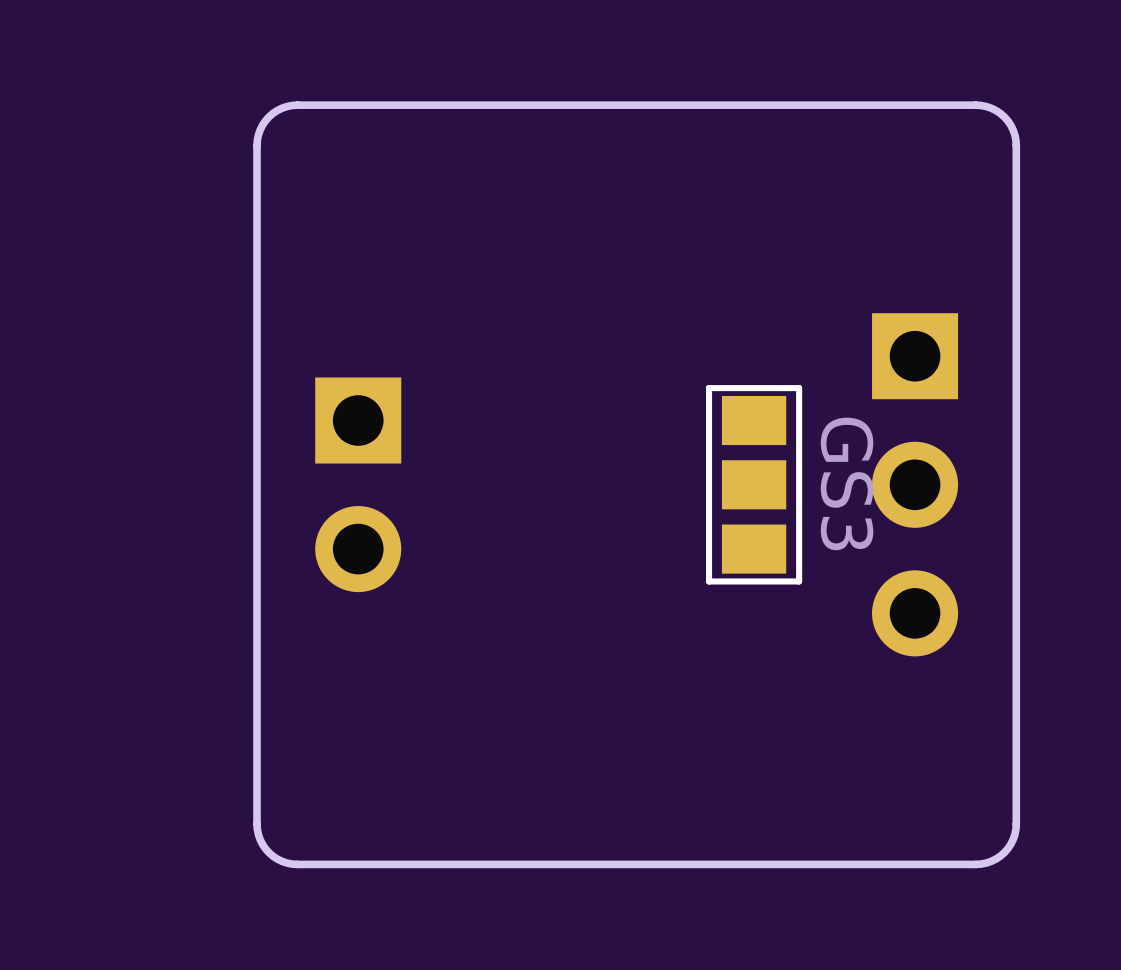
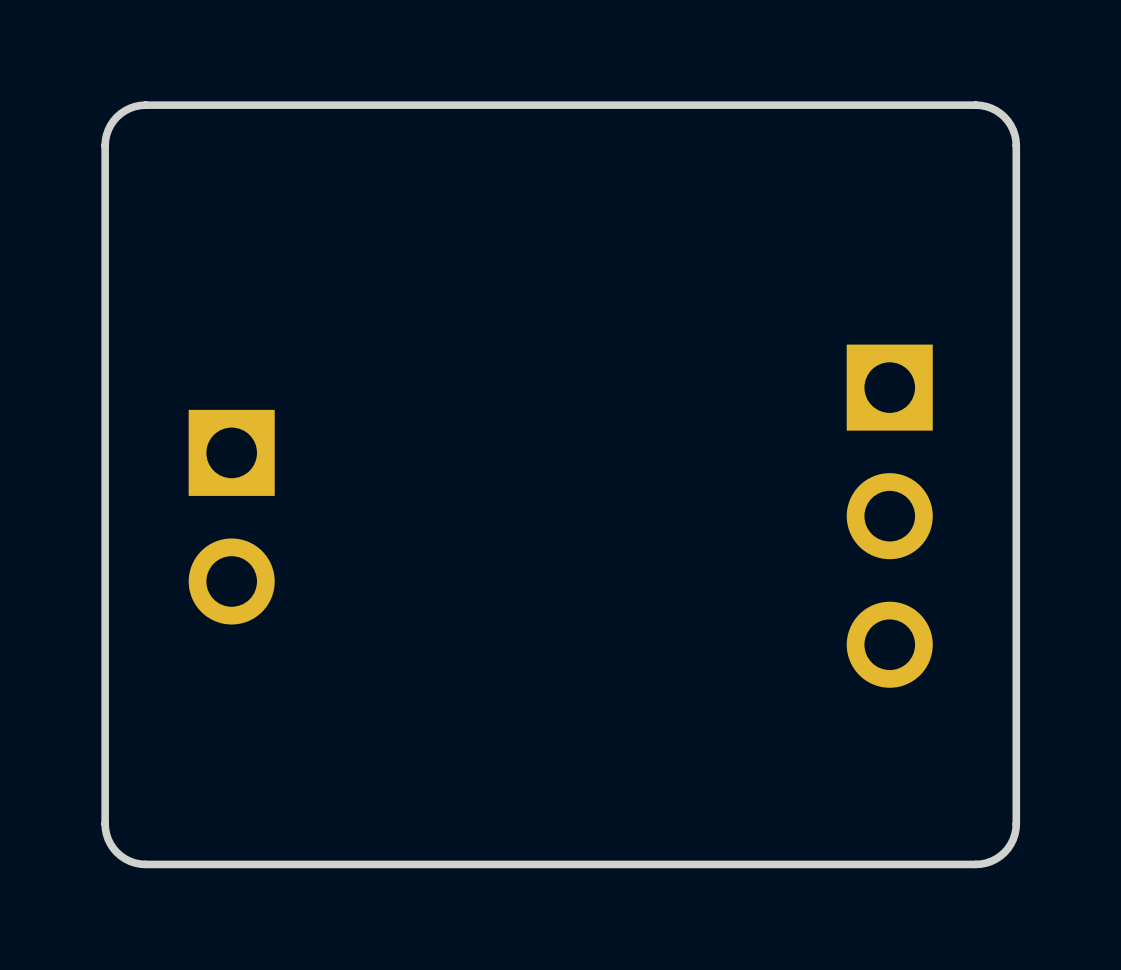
board edge: (297, 105) (282, 108) (268, 117) (260, 130) (257, 145) (257, 823) (260, 839) (268, 852) (282, 861) (297, 864) -> (297, 105) (135, 106) (120, 113) (113, 120) (108, 130) (105, 145) (106, 834) (117, 852) (125, 859) (140, 864) (297, 864)
part position: (358, 484) -> (231, 517)
part: GS3 (754, 484) -> none
part position: (915, 484) -> (889, 516)

